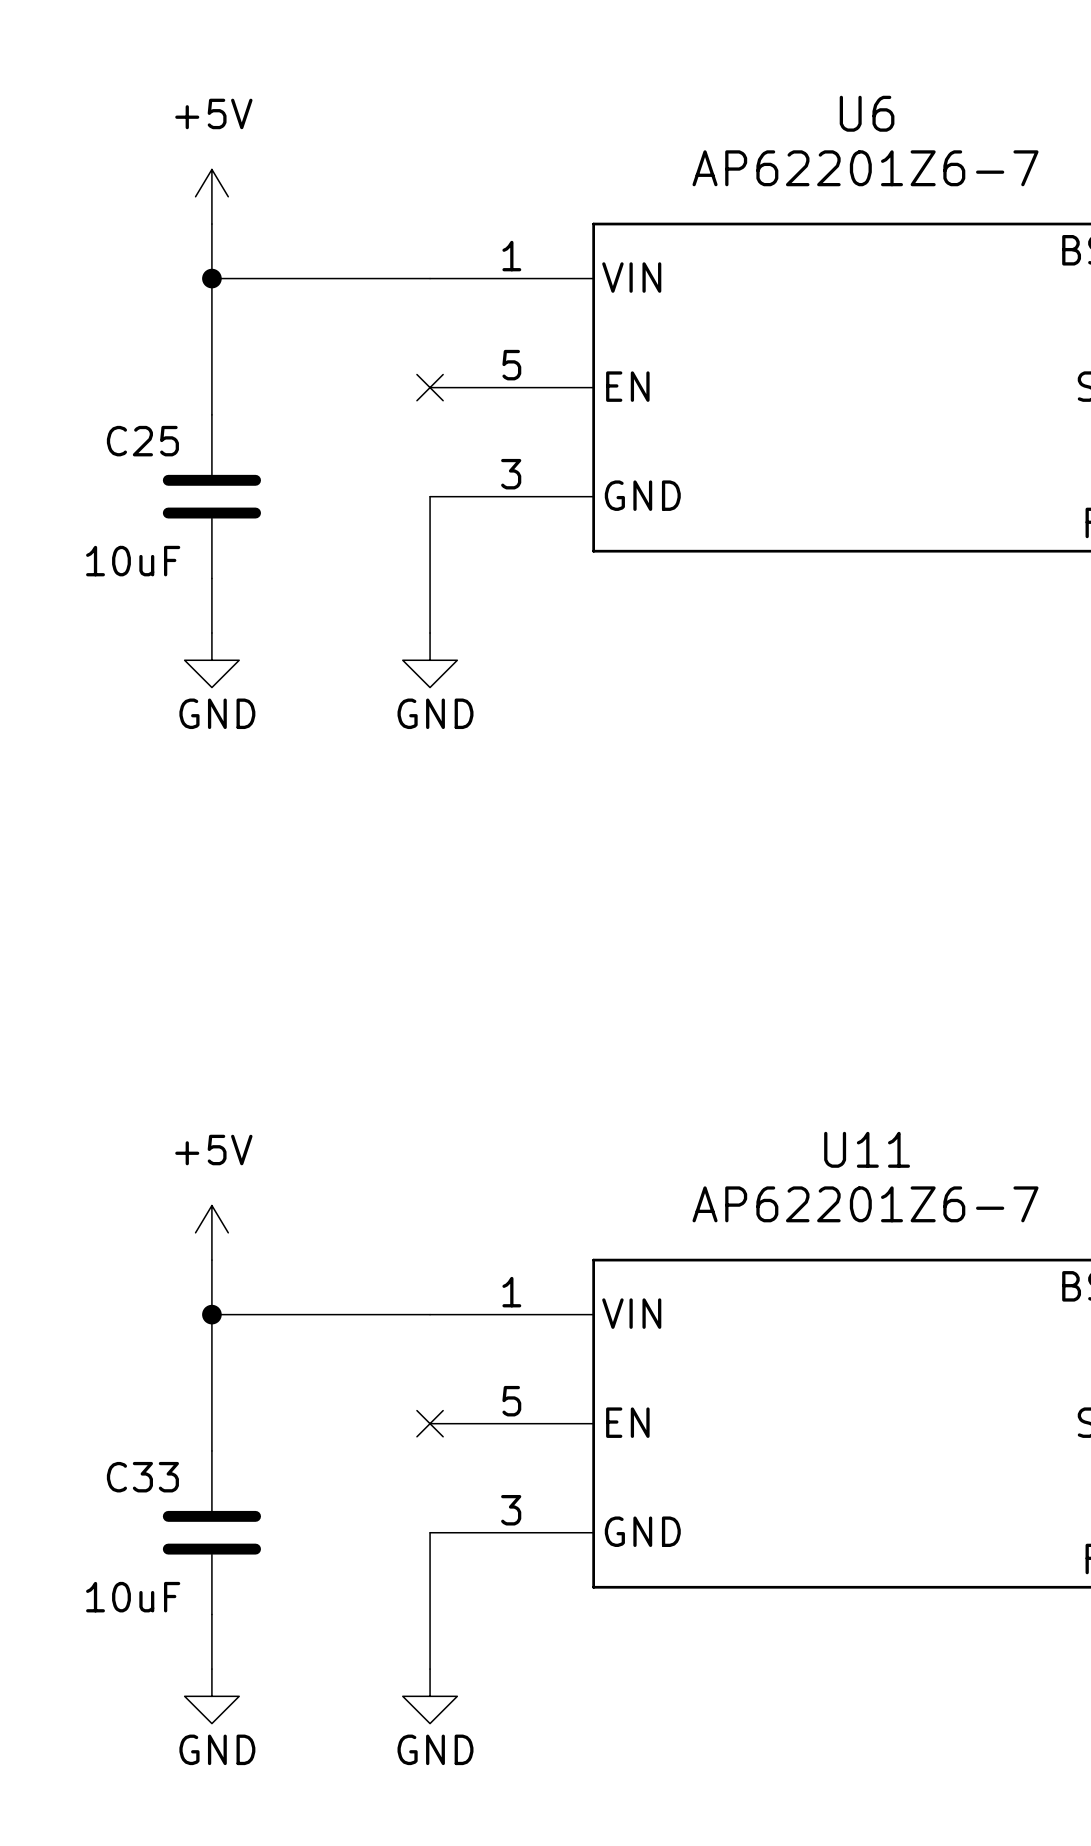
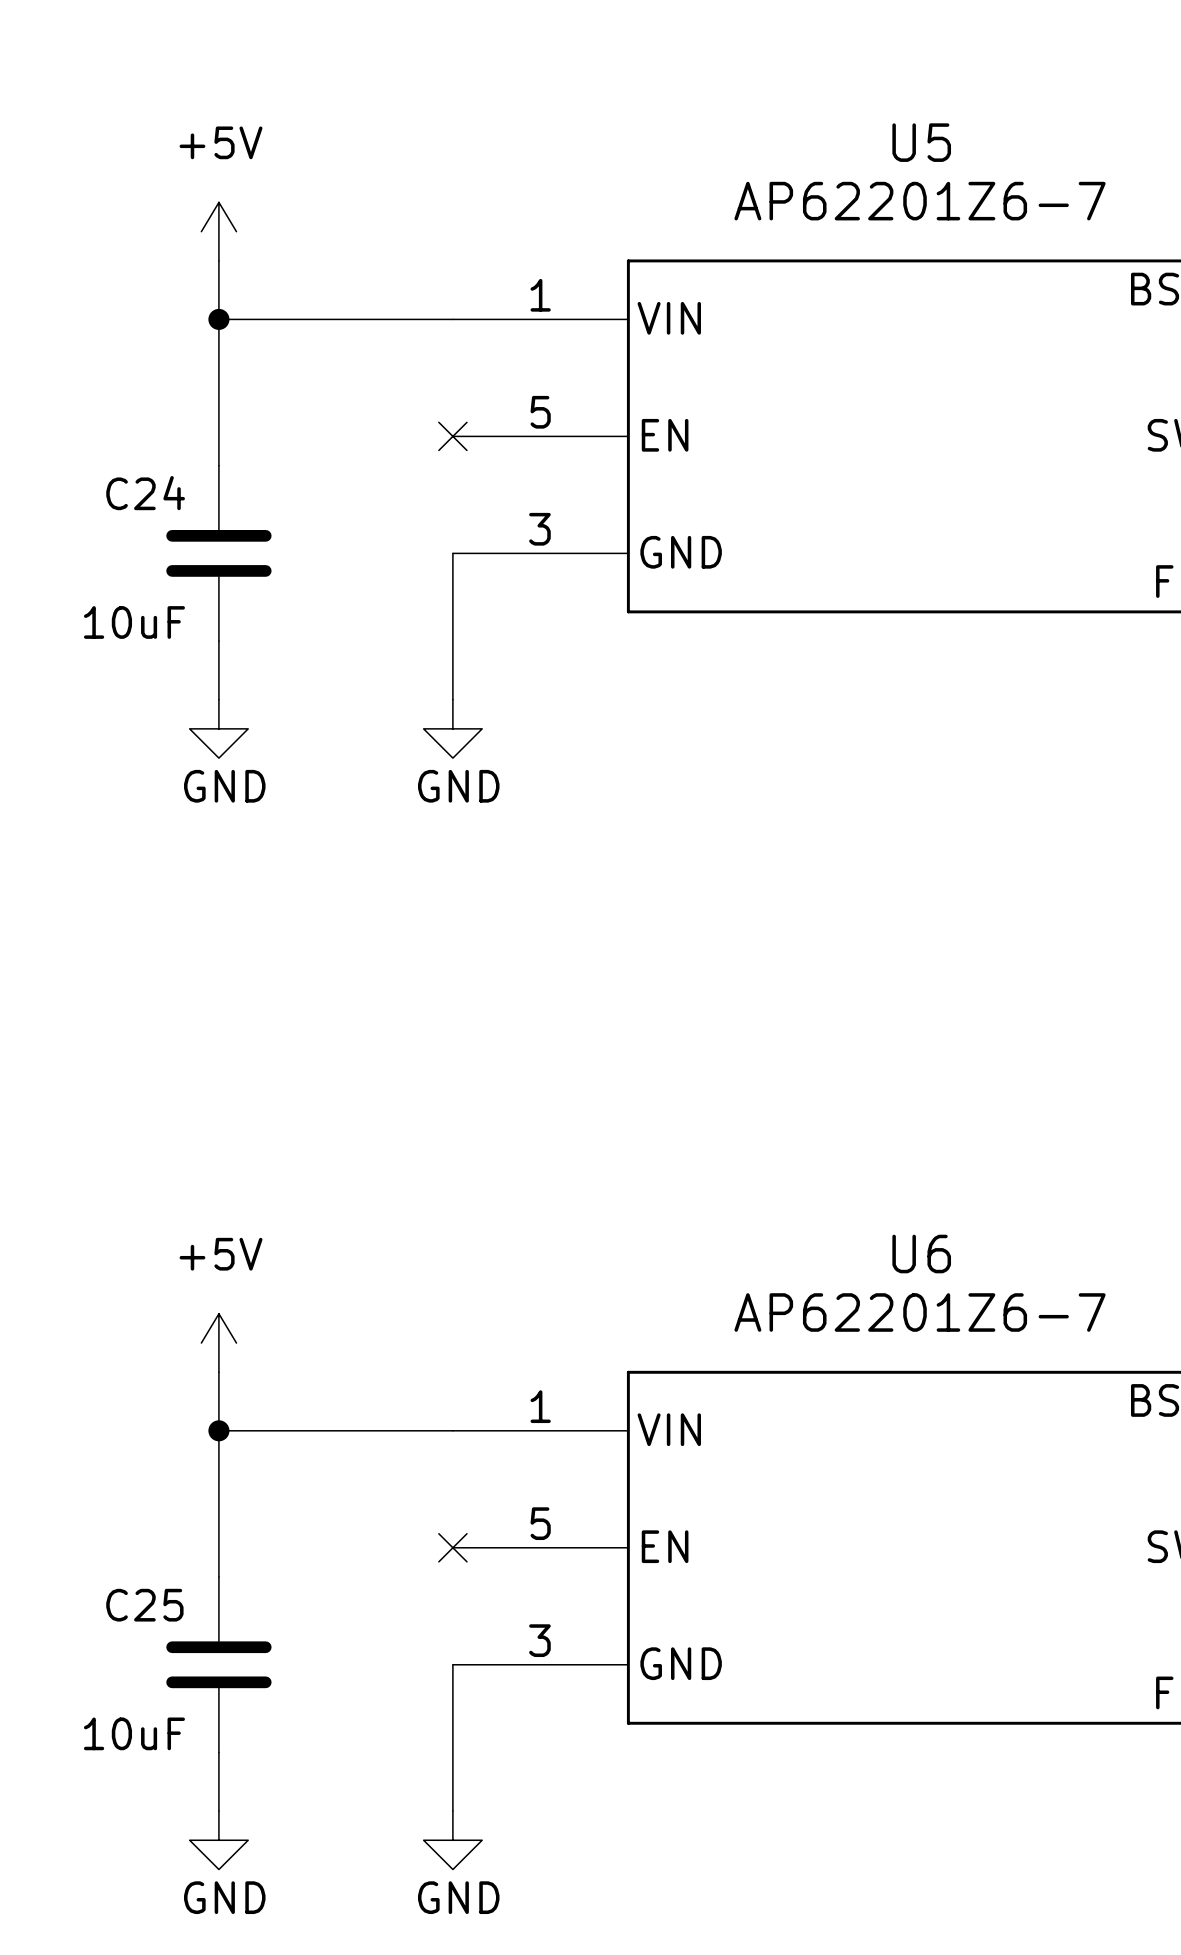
U6 name: U6 (867, 113) -> U5 (921, 142)
C25 name: C25 (142, 441) -> C24 (145, 493)
U11 name: U11 (867, 1149) -> U6 (921, 1254)
C33 name: C33 (142, 1477) -> C25 (144, 1605)

